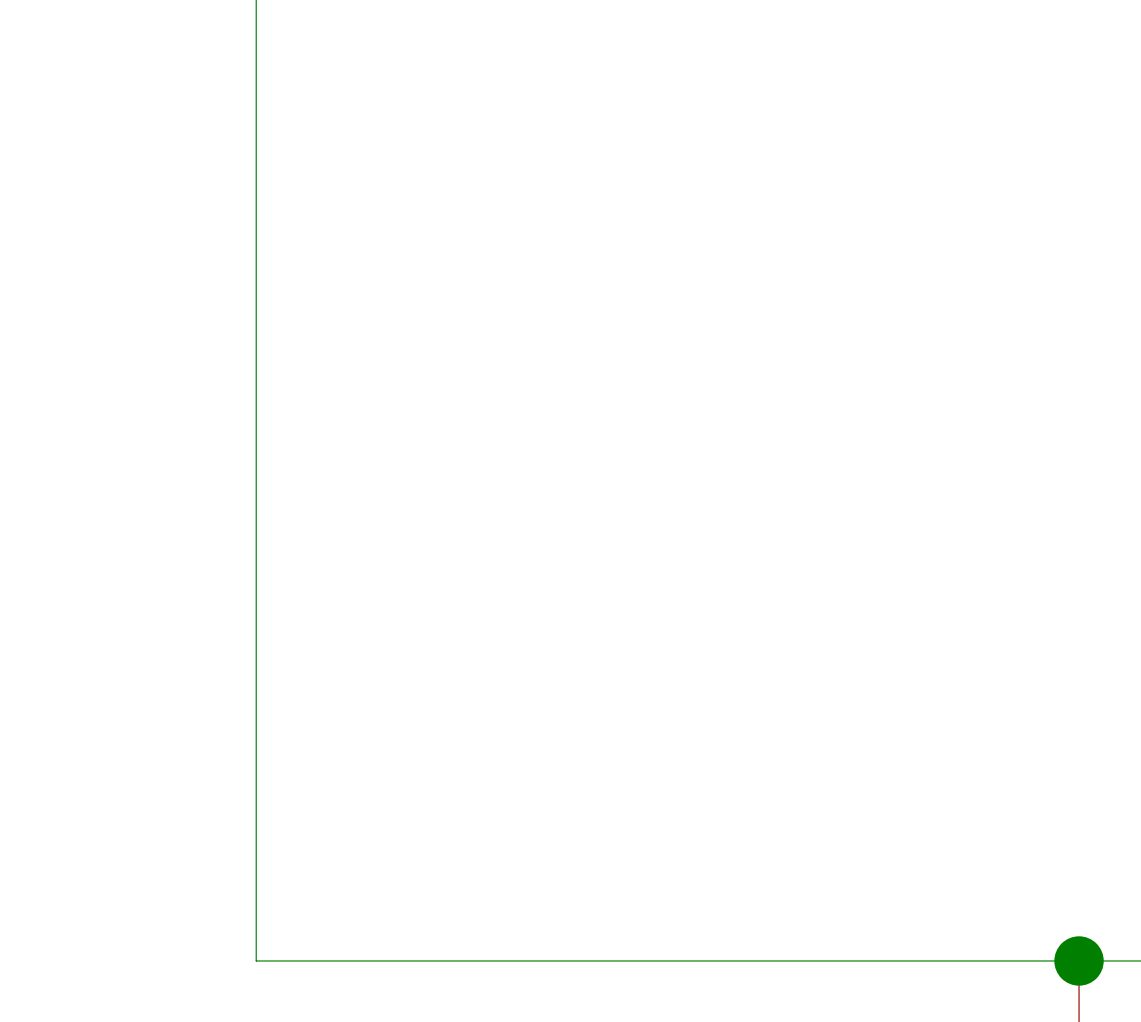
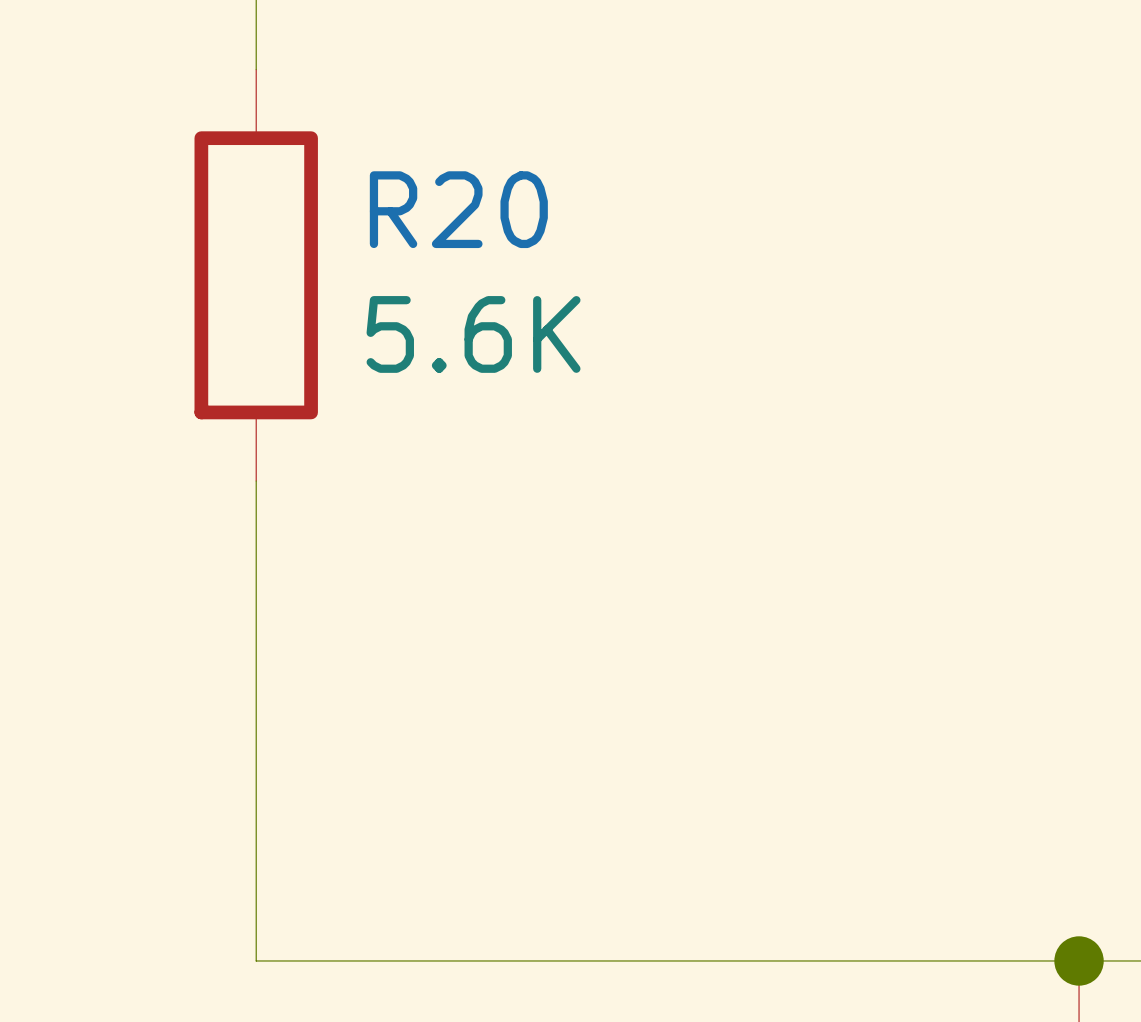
wire: (256, 69) (256, 481) -> none
R20: none -> 5.6K (256, 275)

